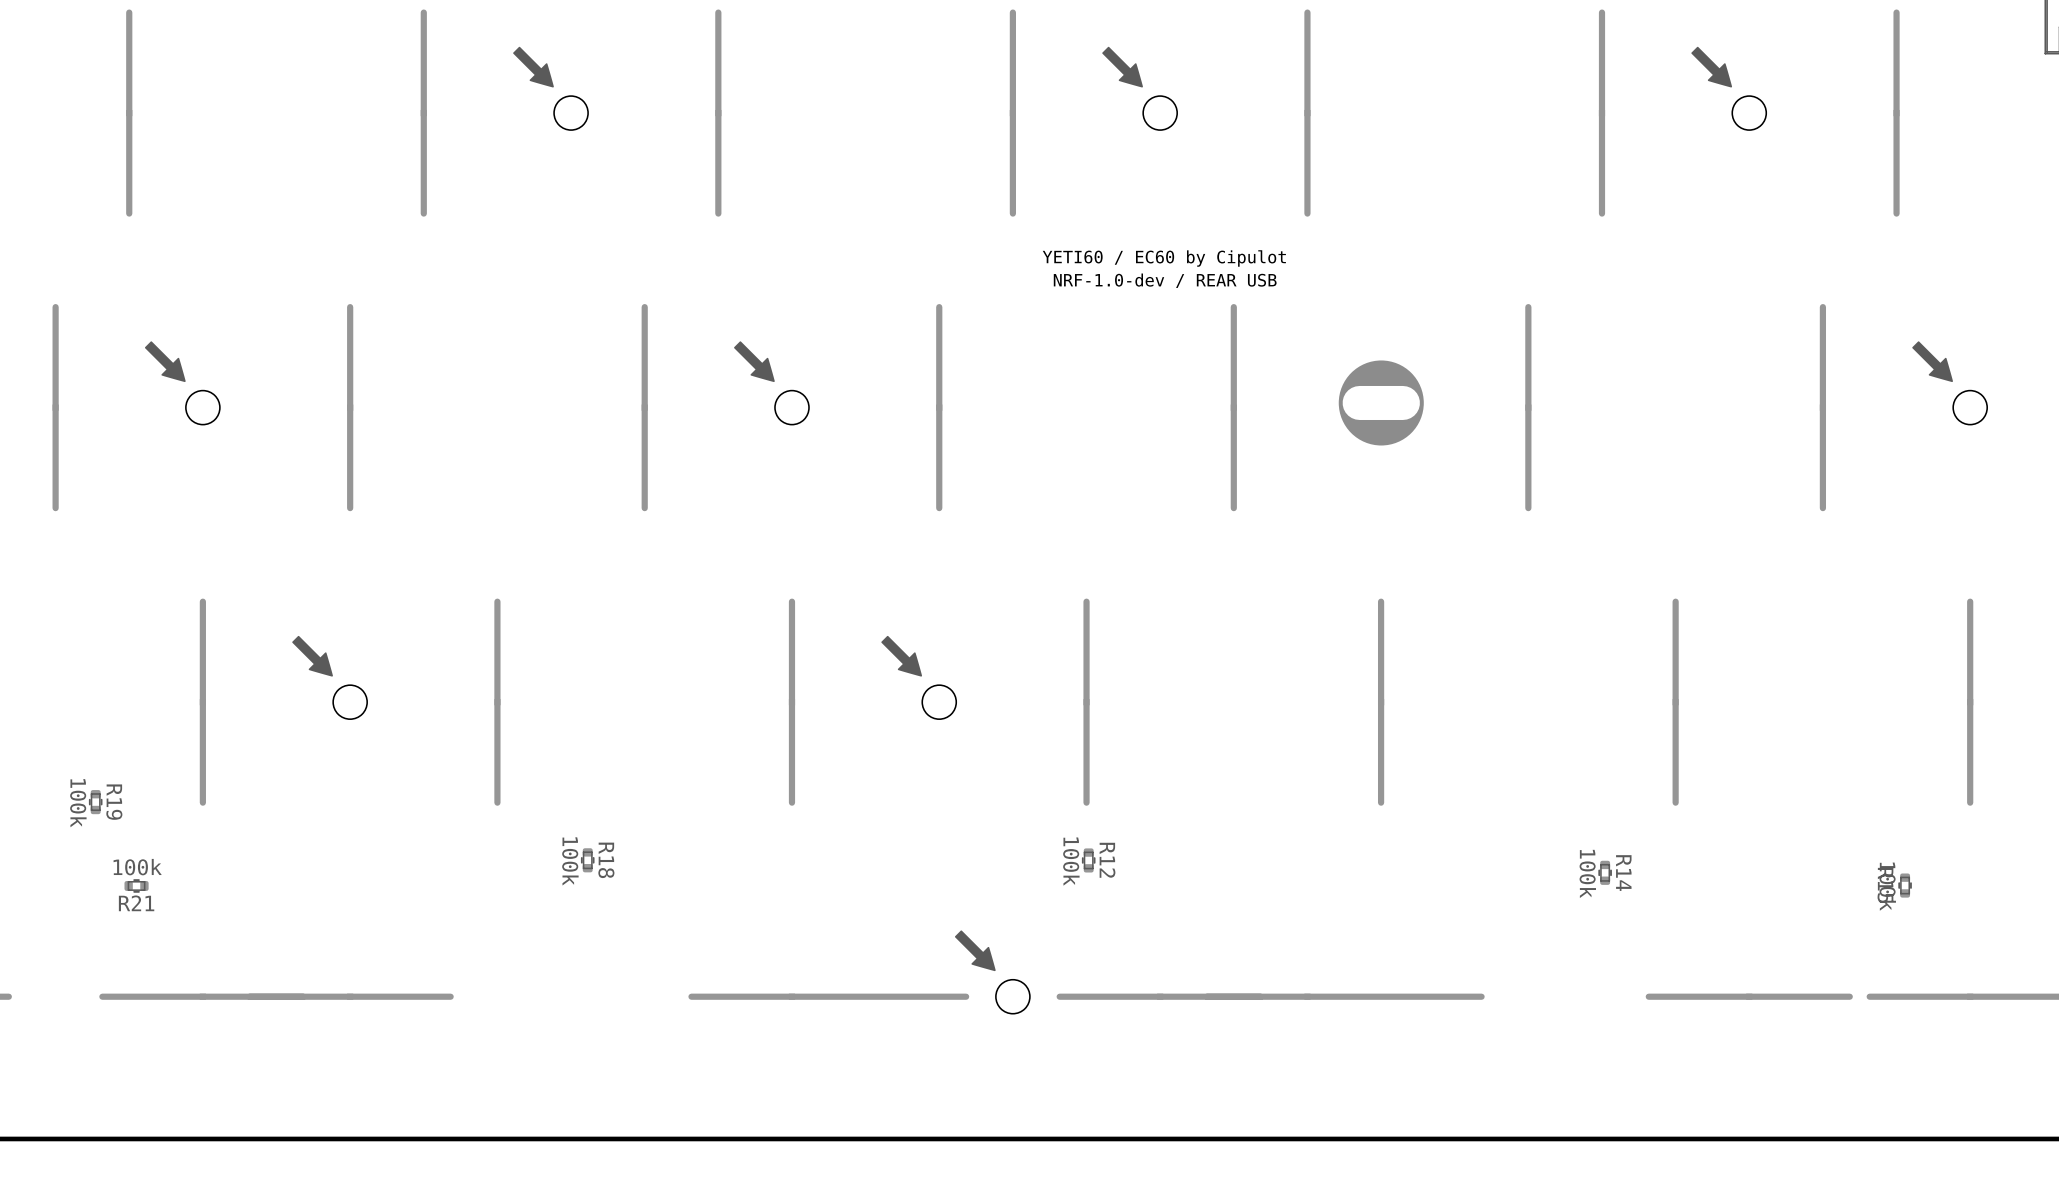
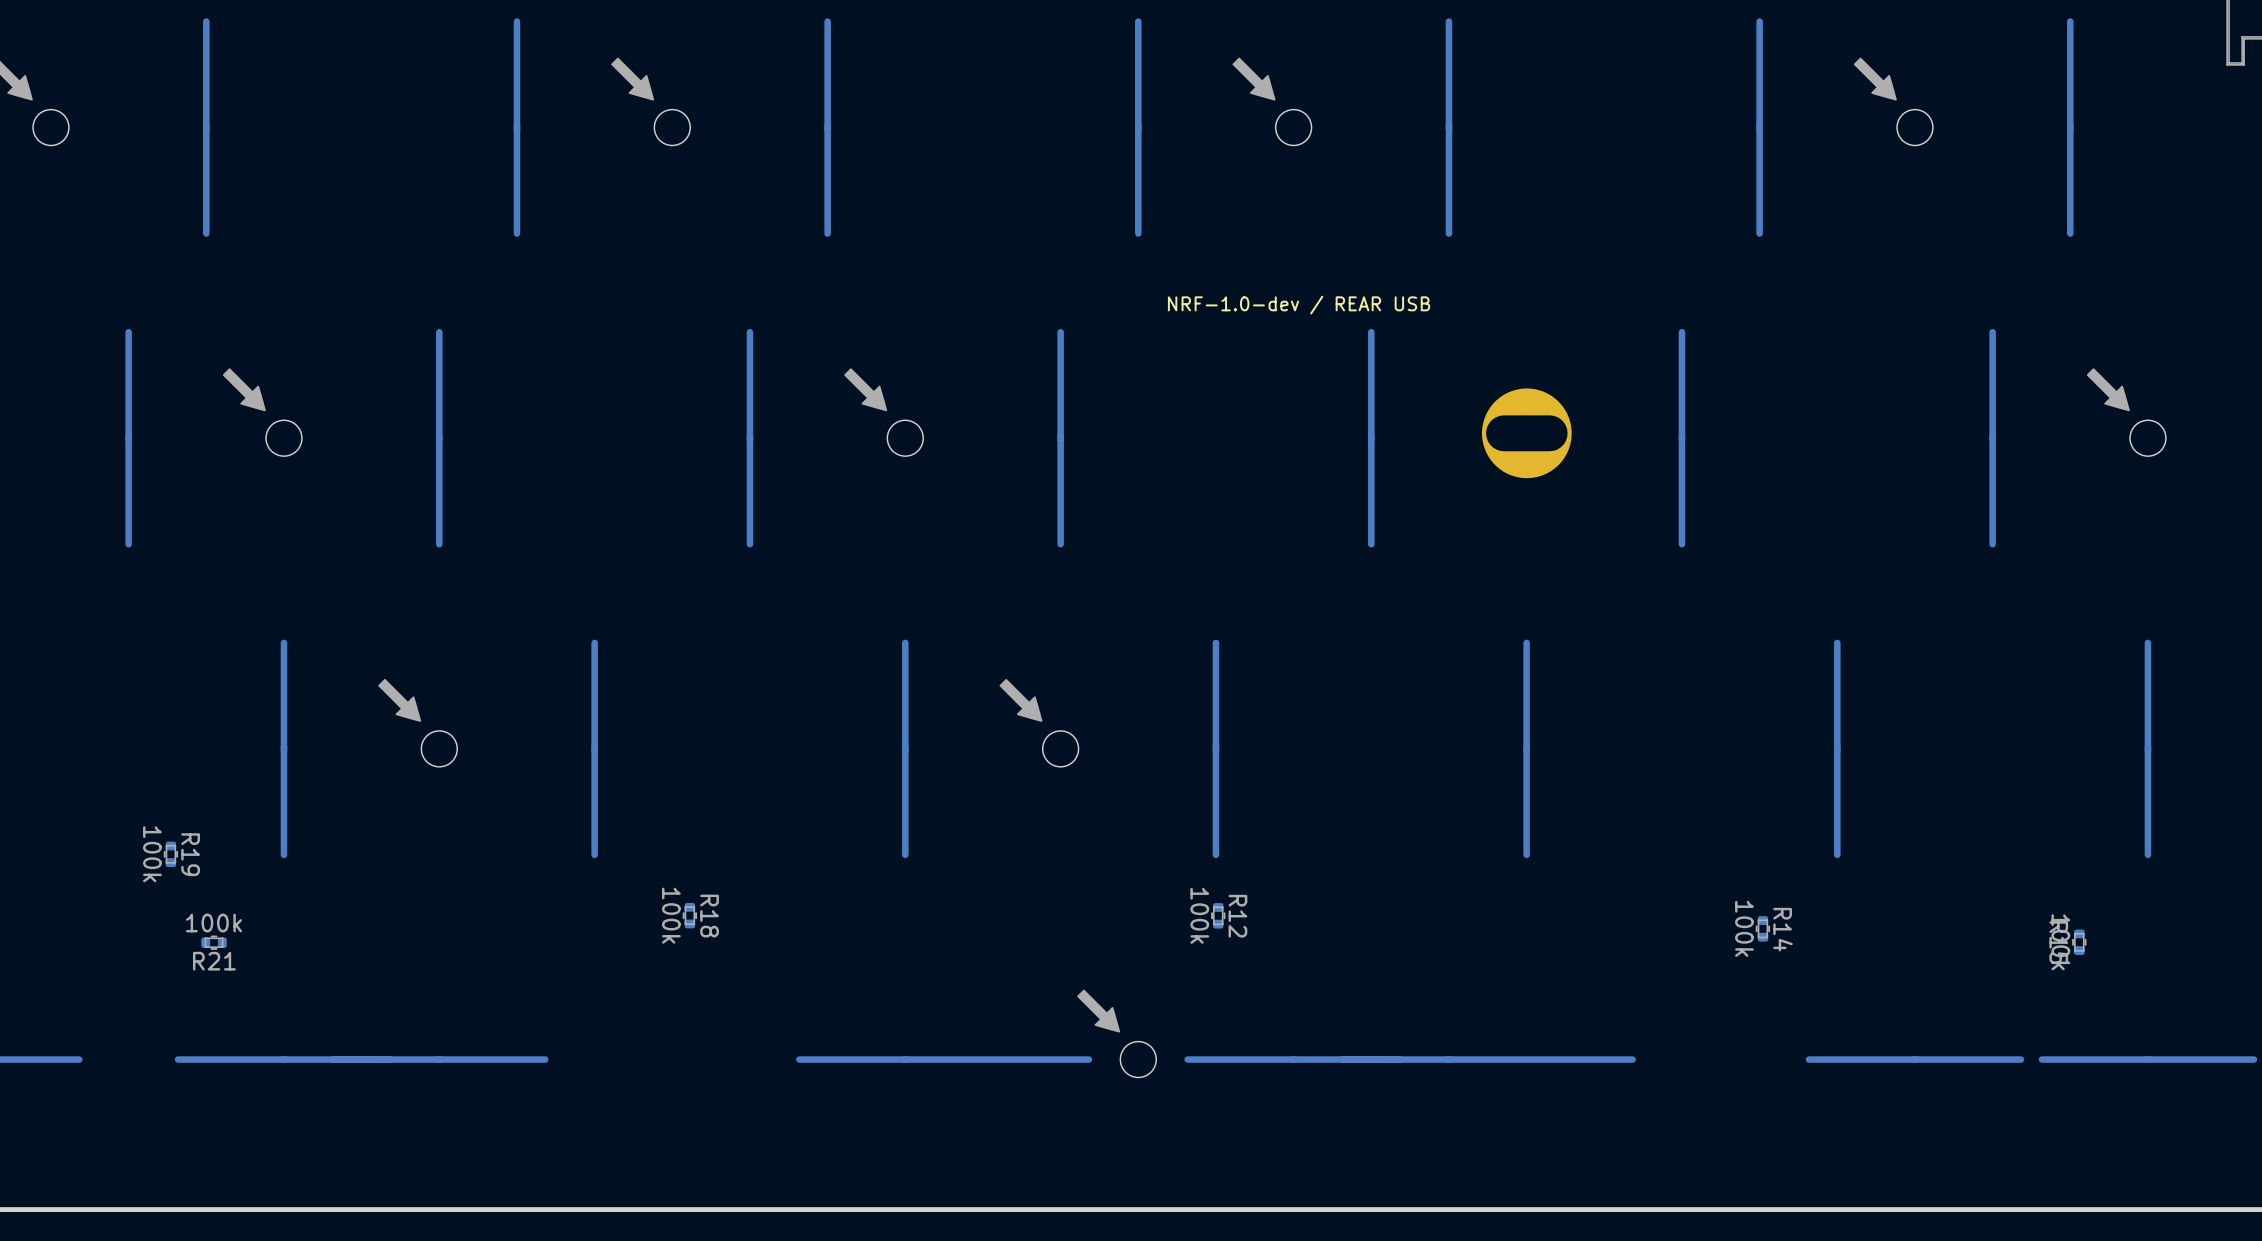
text: YETI60 / EC60 by Cipulot (1164, 258) -> none

